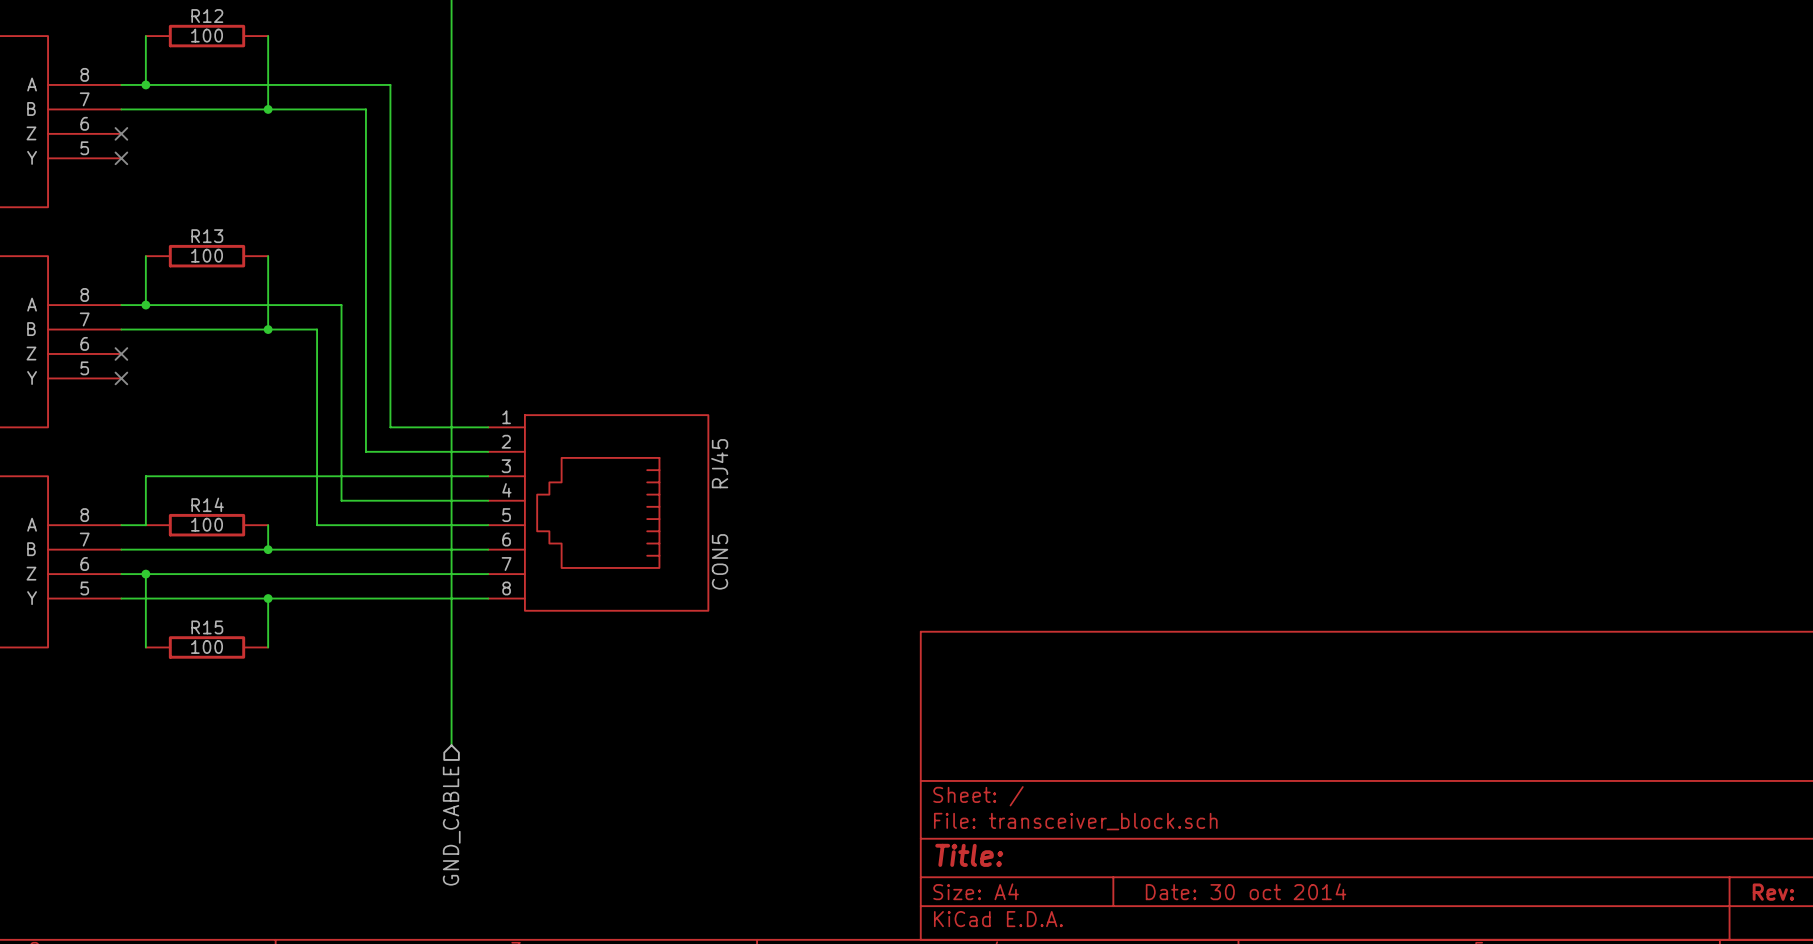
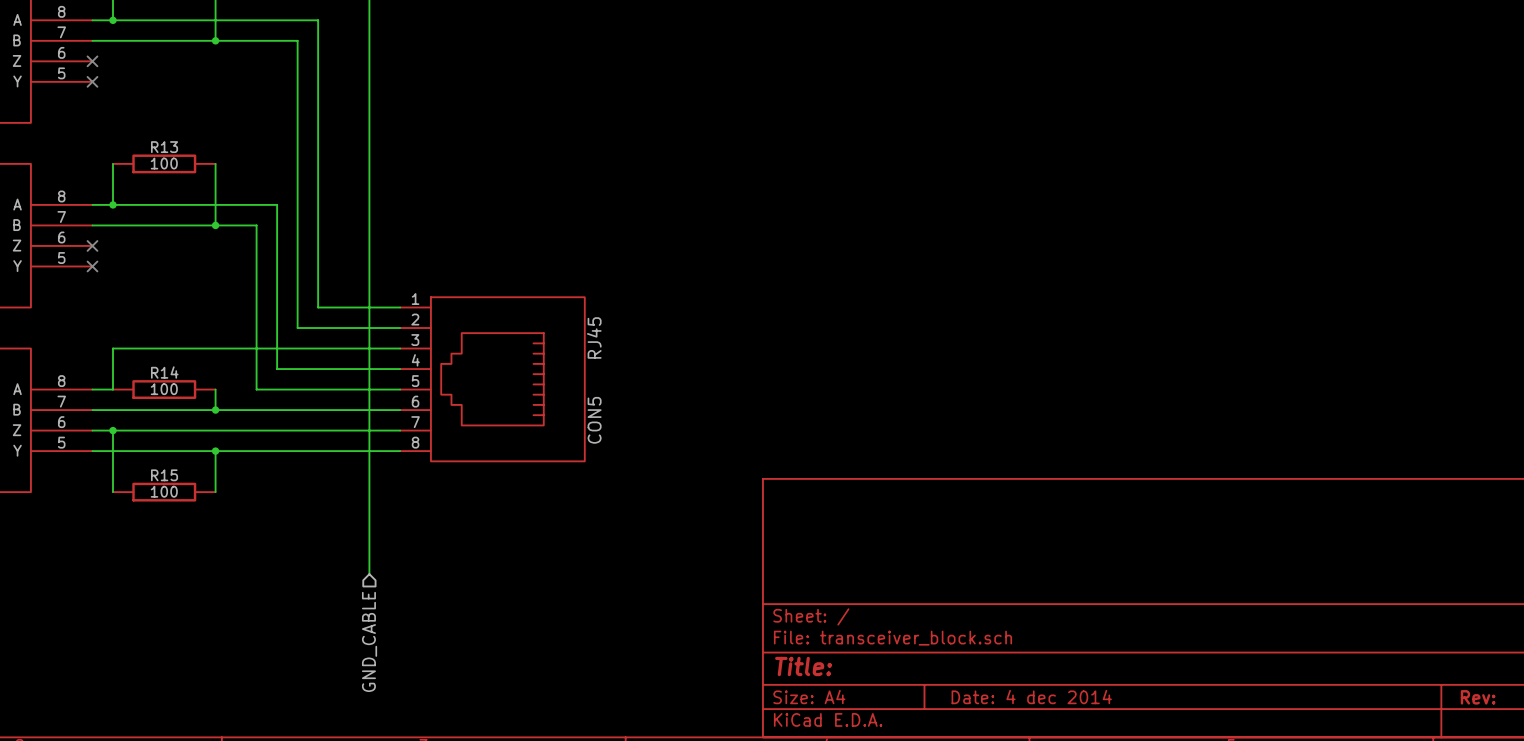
title block: Date: 30 oct 2014 (1246, 891) -> Date: 4 dec 2014 (1031, 697)

